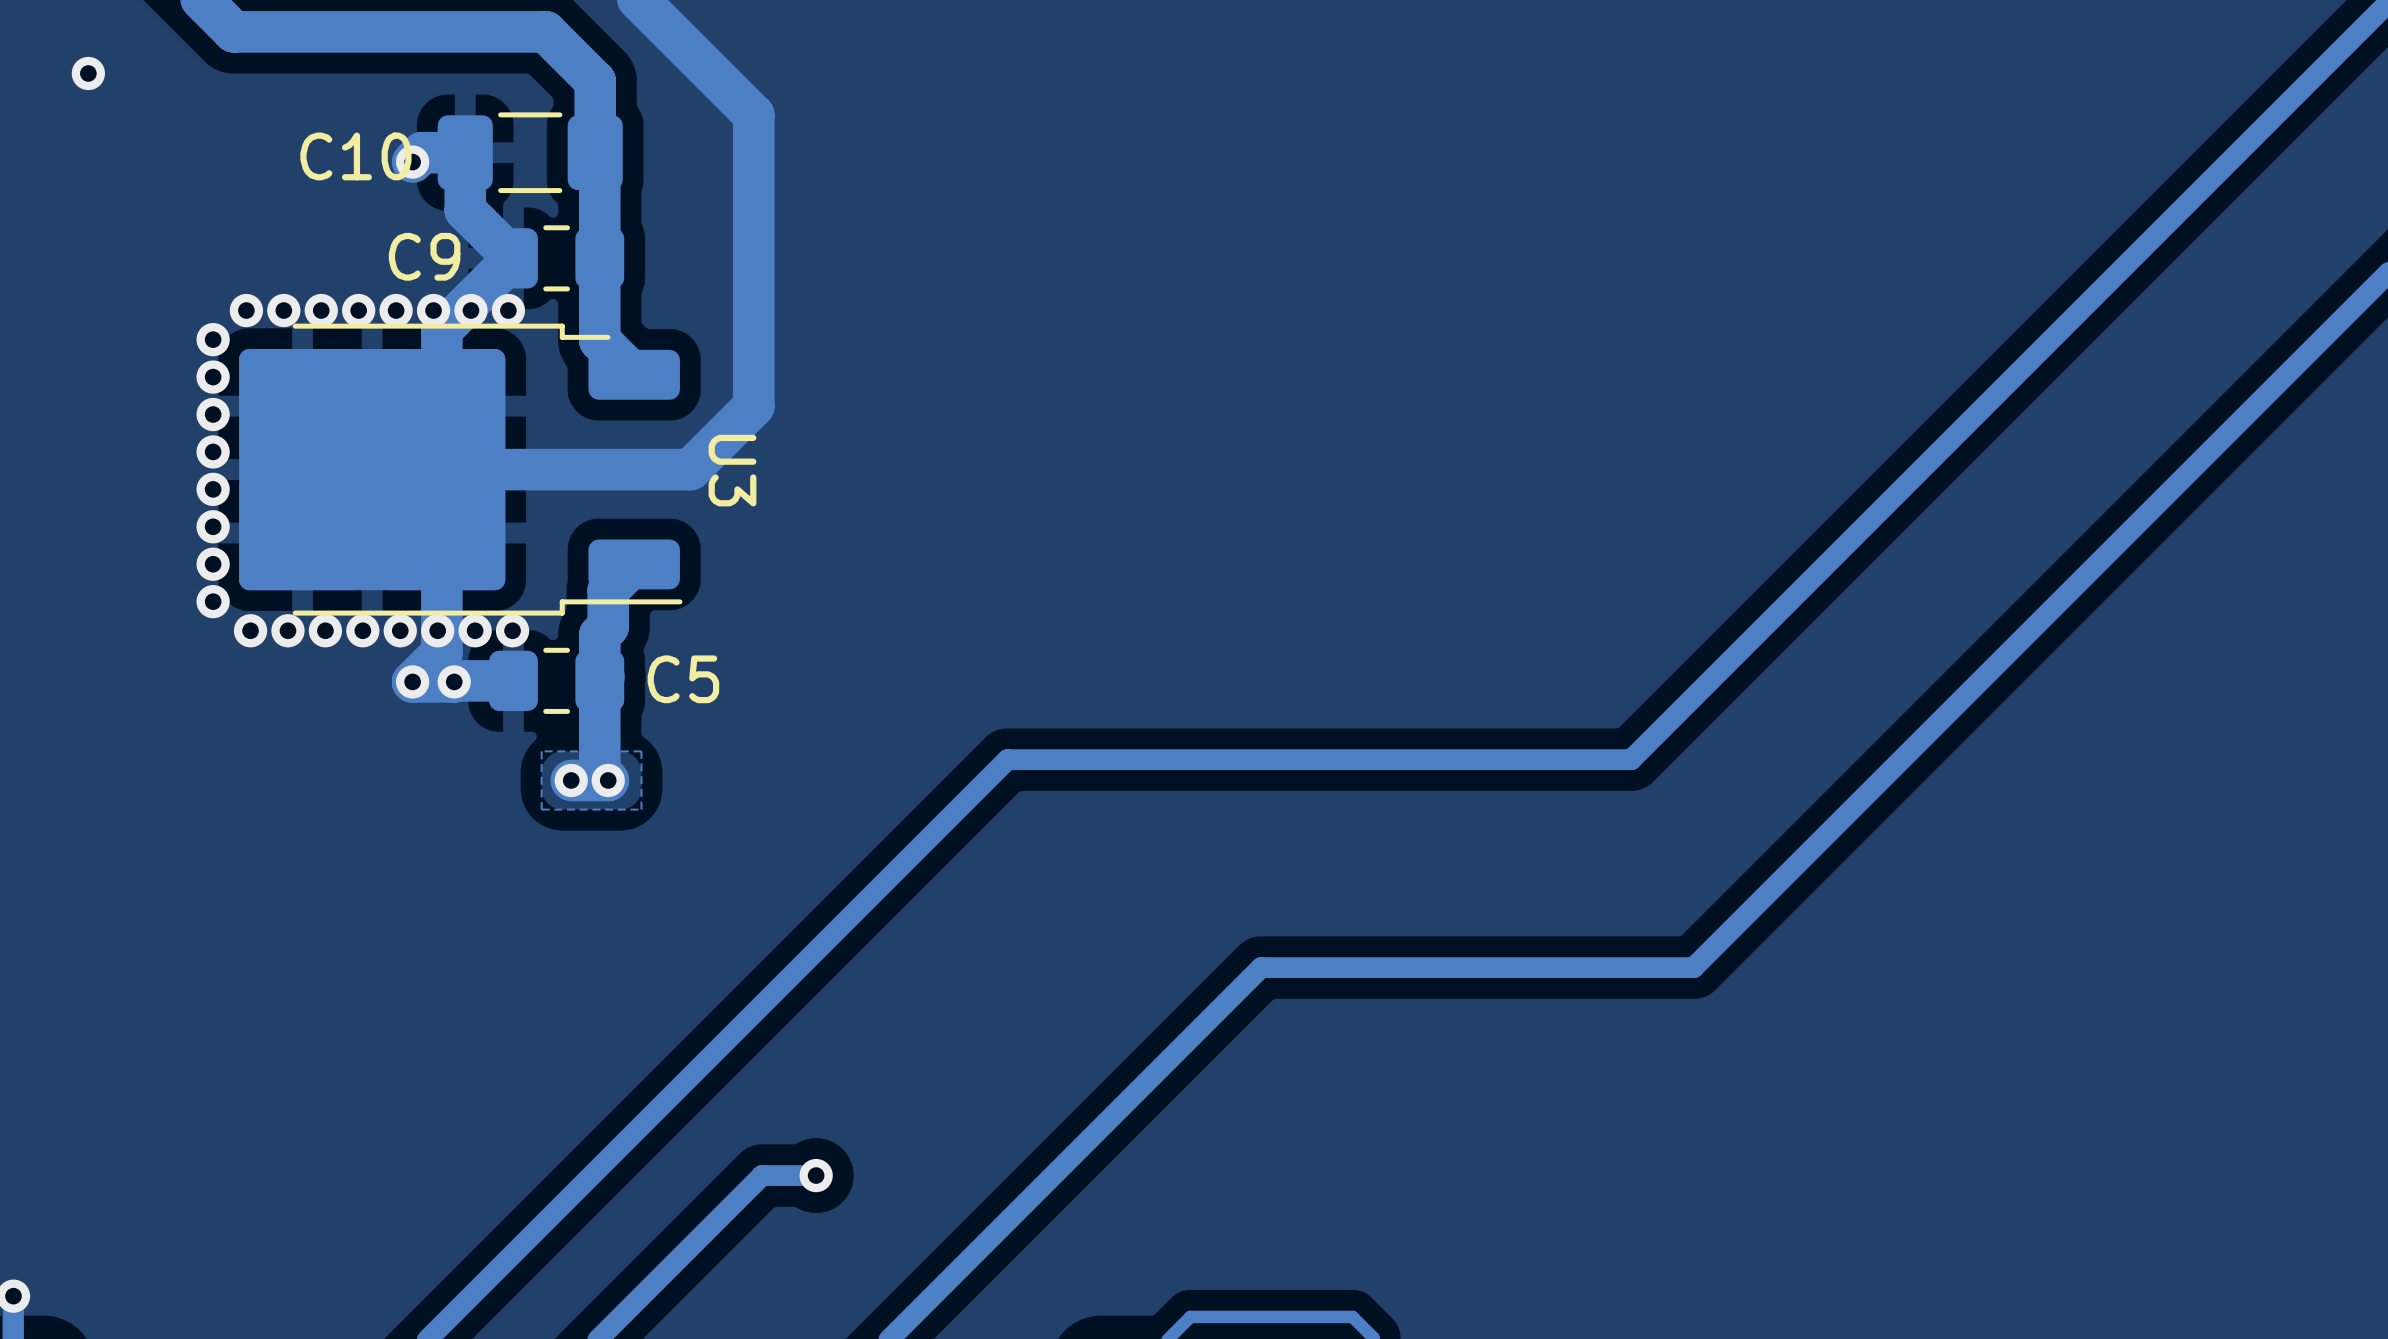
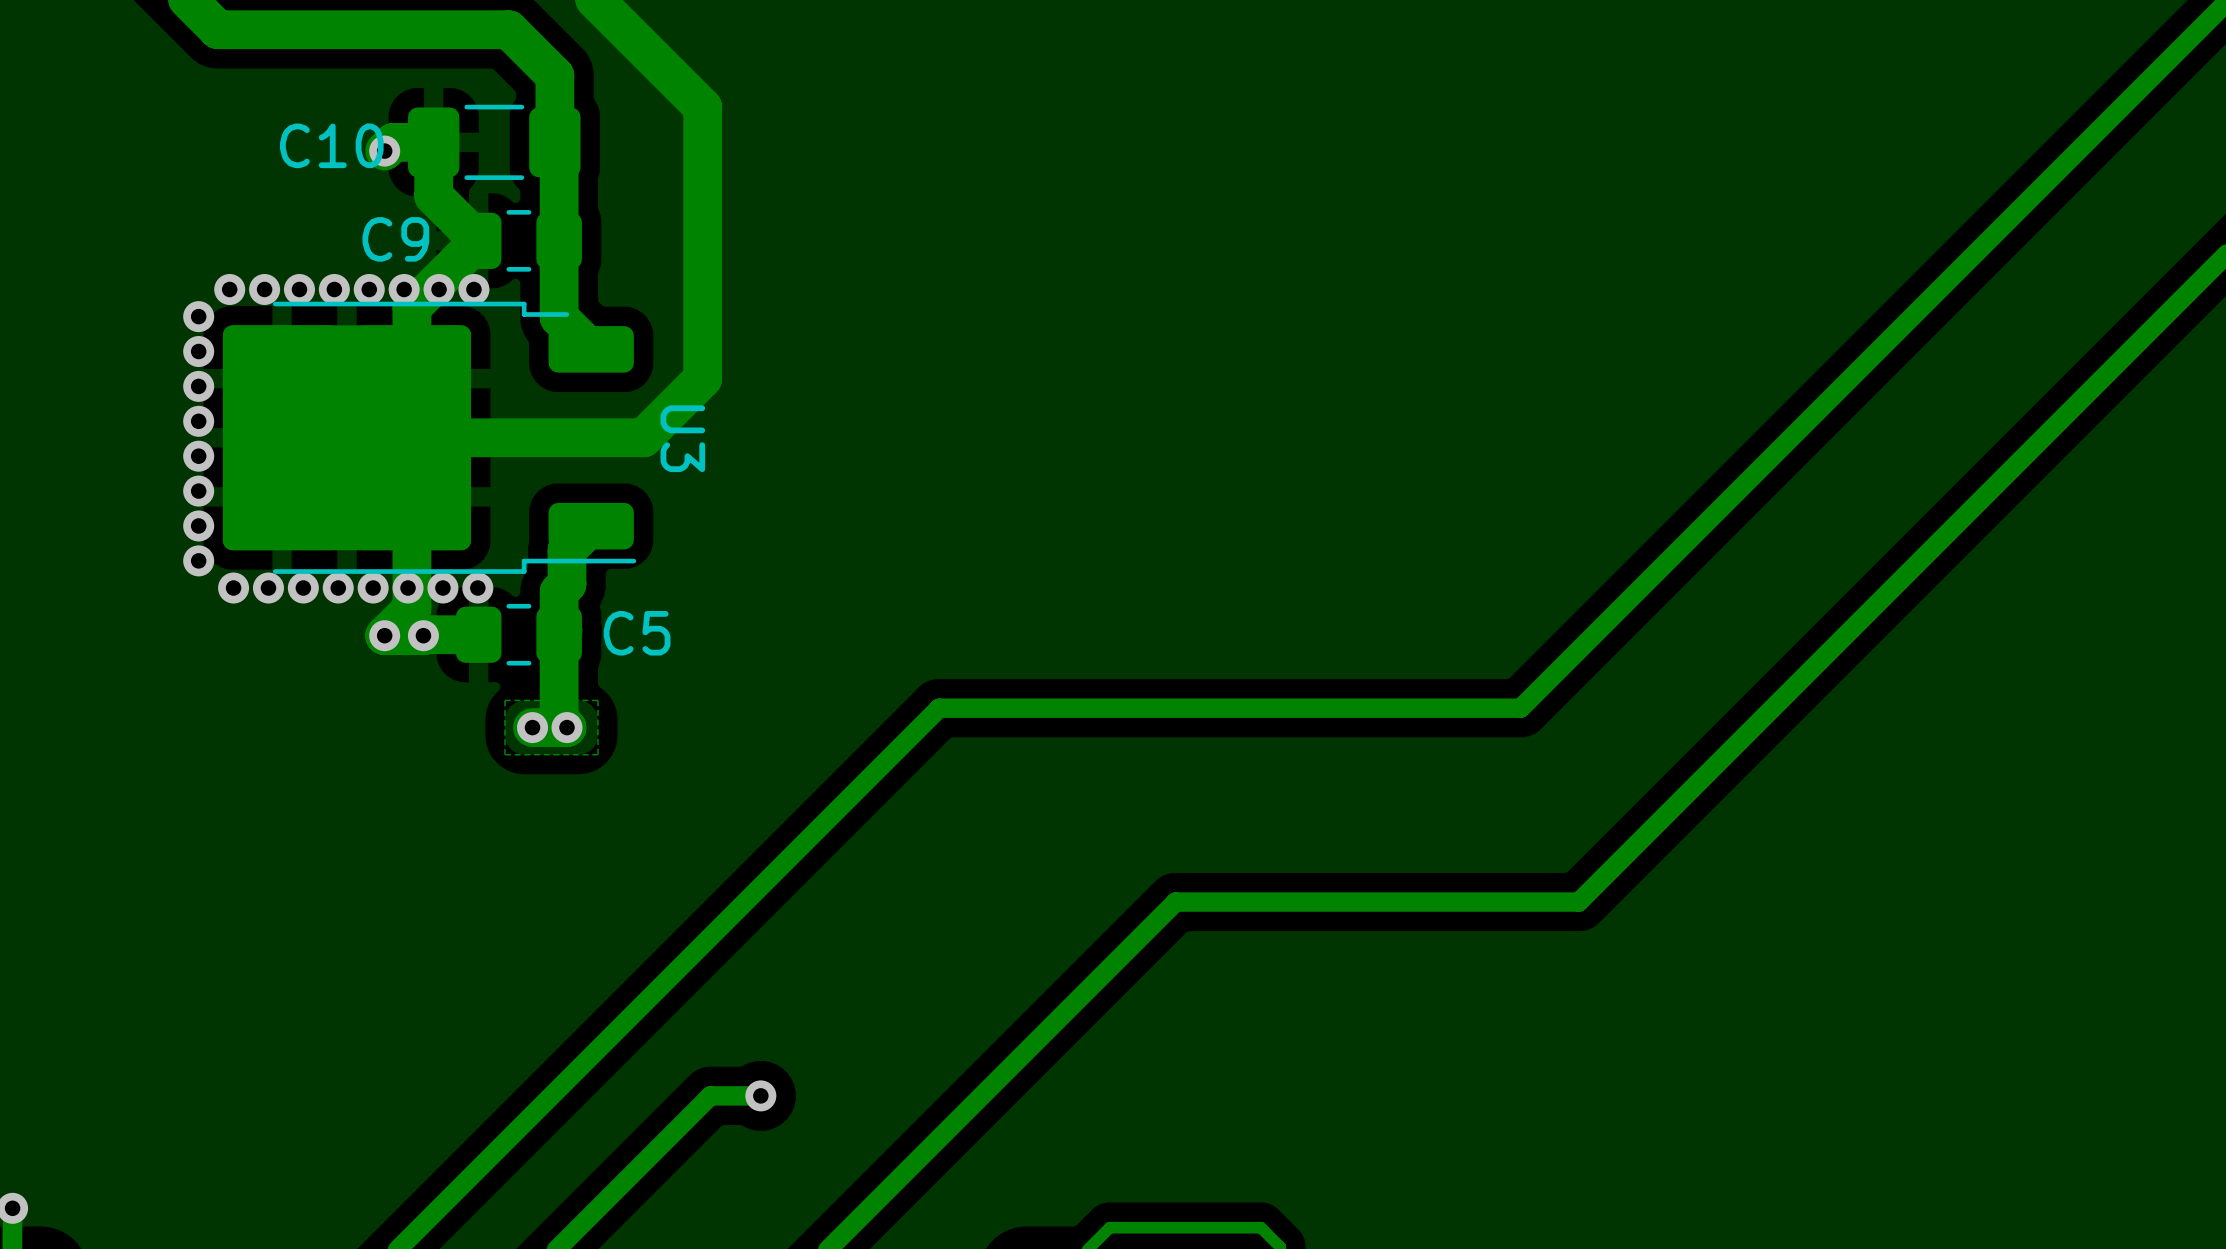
via: (88, 73) -> none

